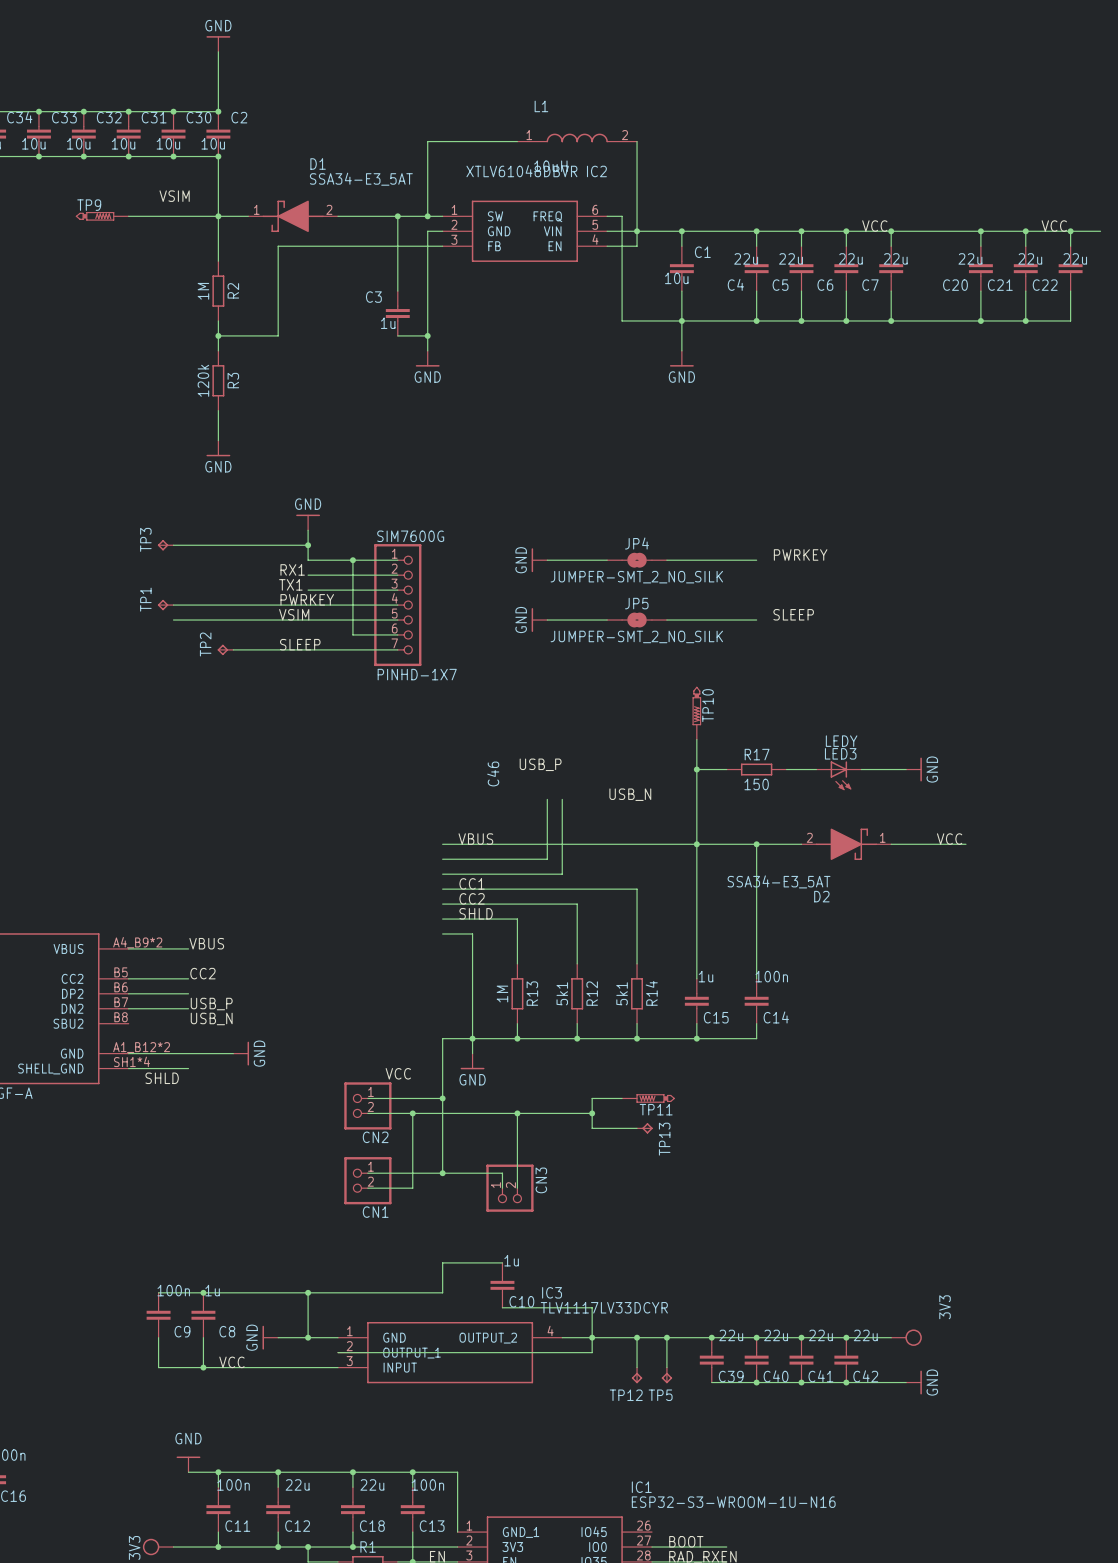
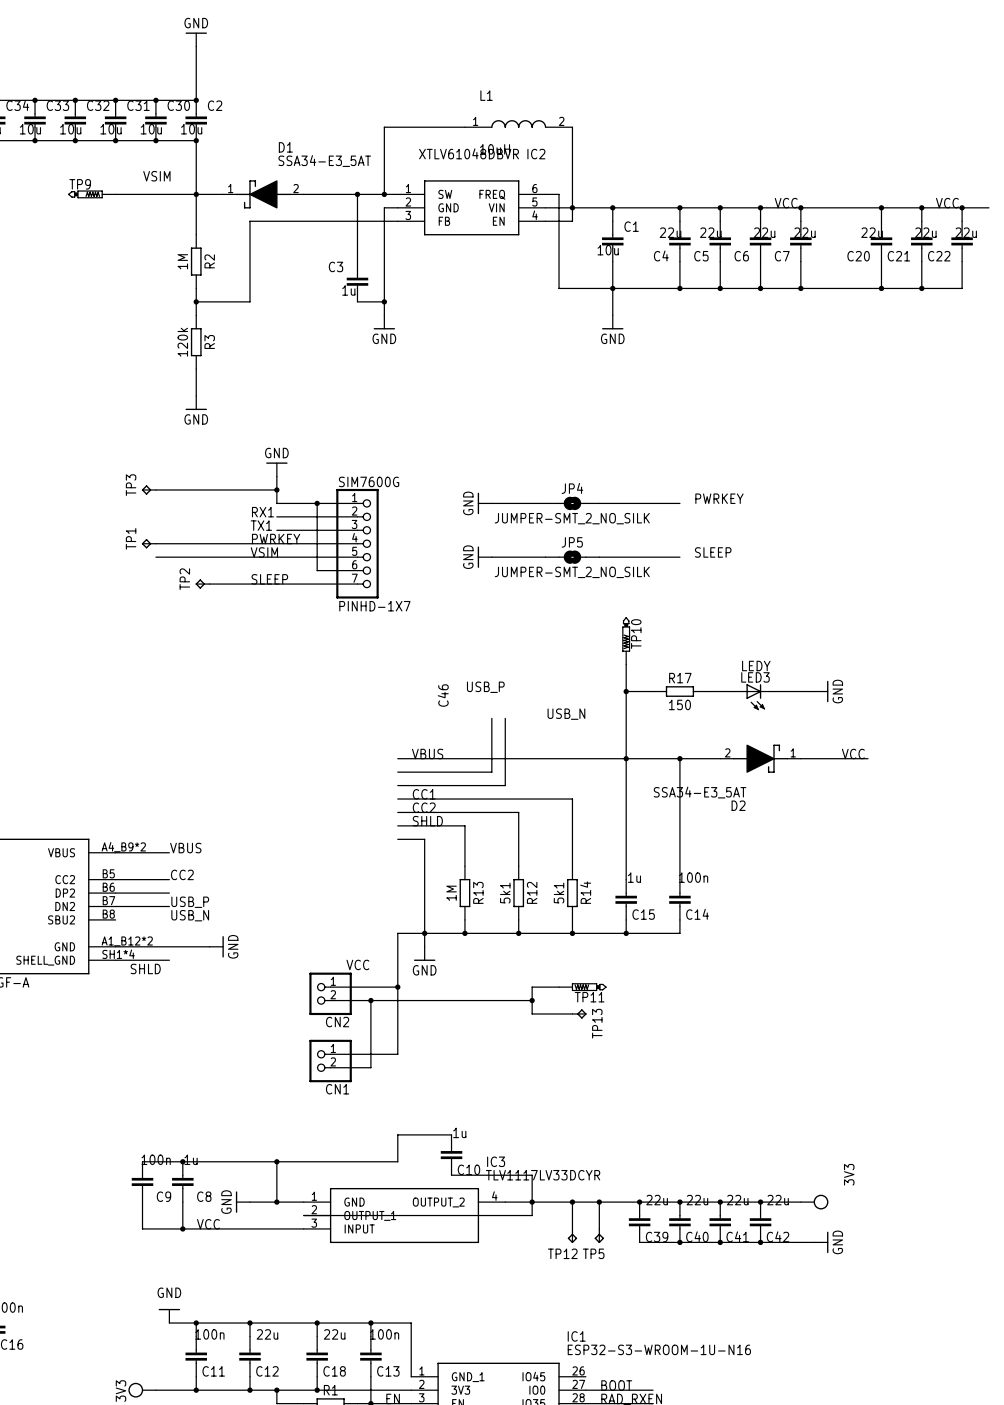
wire: (517, 1113) (517, 1188) -> none
junction: (517, 1113) -> none
wire: (442, 1173) (502, 1173) (502, 1188) -> none
junction: (442, 1173) -> none
CN3: (509, 1188) -> none

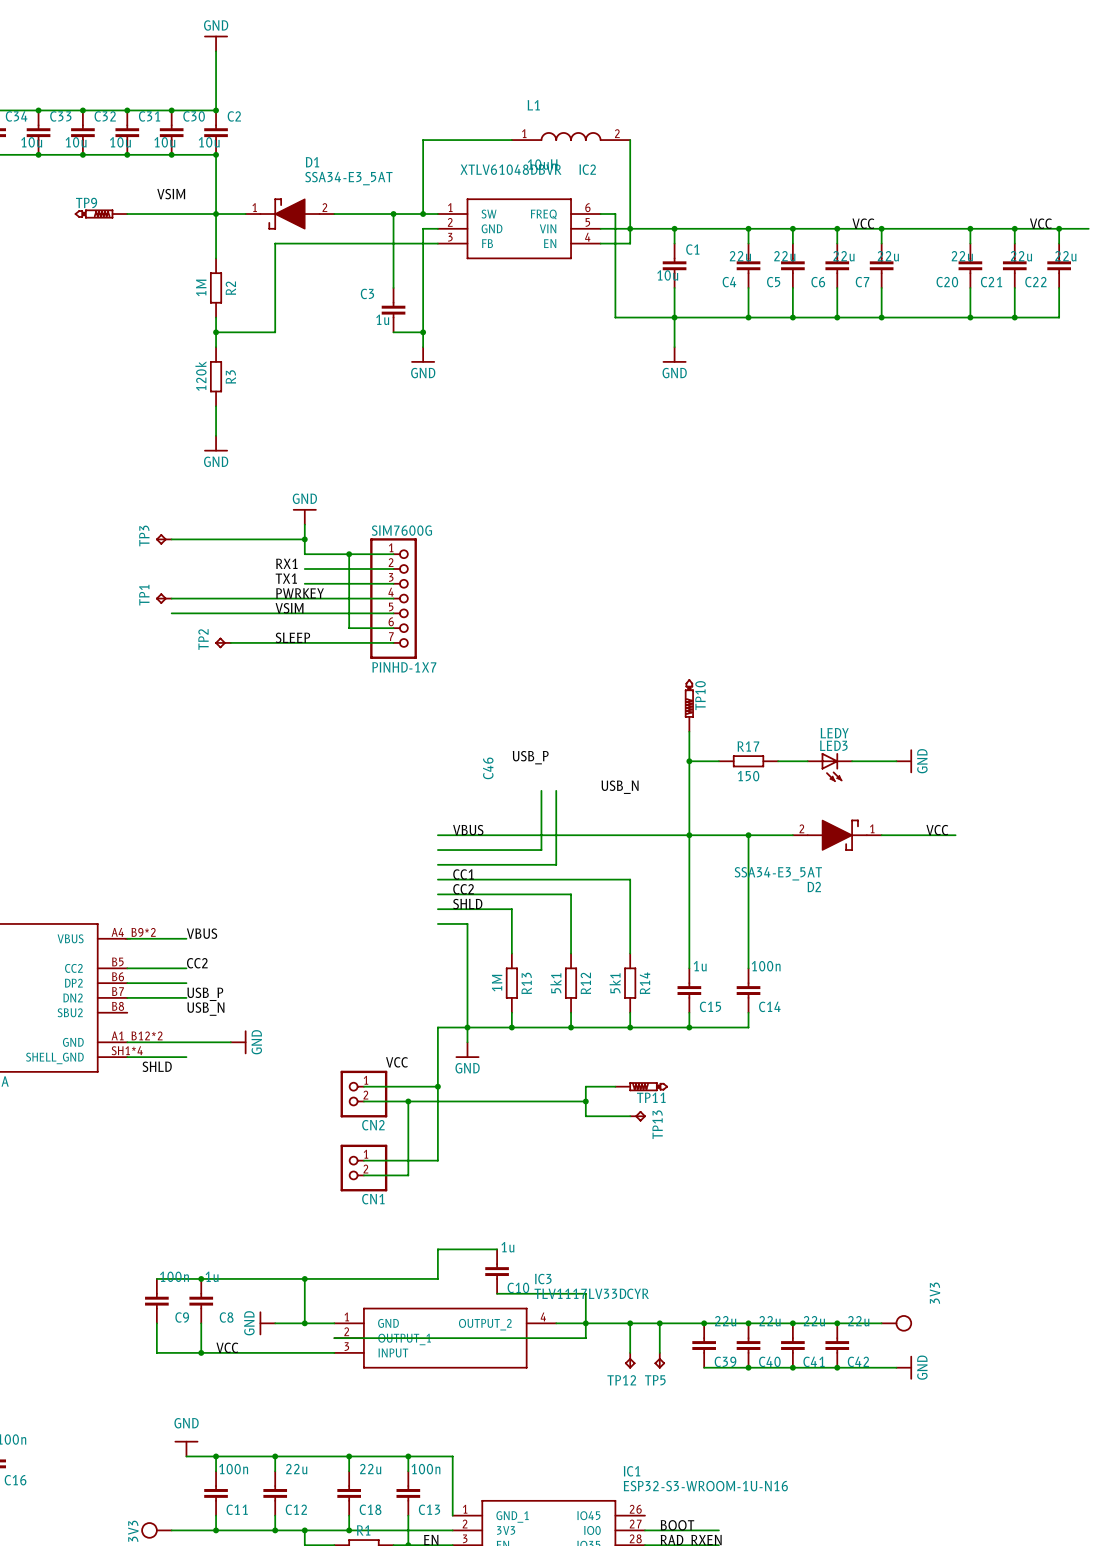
label: PWRKEY (719, 498) -> none
power symbol: GND (484, 503) -> none
wire: (491, 503) (545, 503) -> none
JP4: JUMPER-SMT_2_NO_SILK (572, 503) -> none
wire: (599, 503) (679, 503) -> none
label: SLEEP (713, 552) -> none
power symbol: GND (484, 557) -> none
wire: (491, 557) (545, 557) -> none
JP5: JUMPER-SMT_2_NO_SILK (572, 557) -> none
wire: (599, 557) (679, 557) -> none

